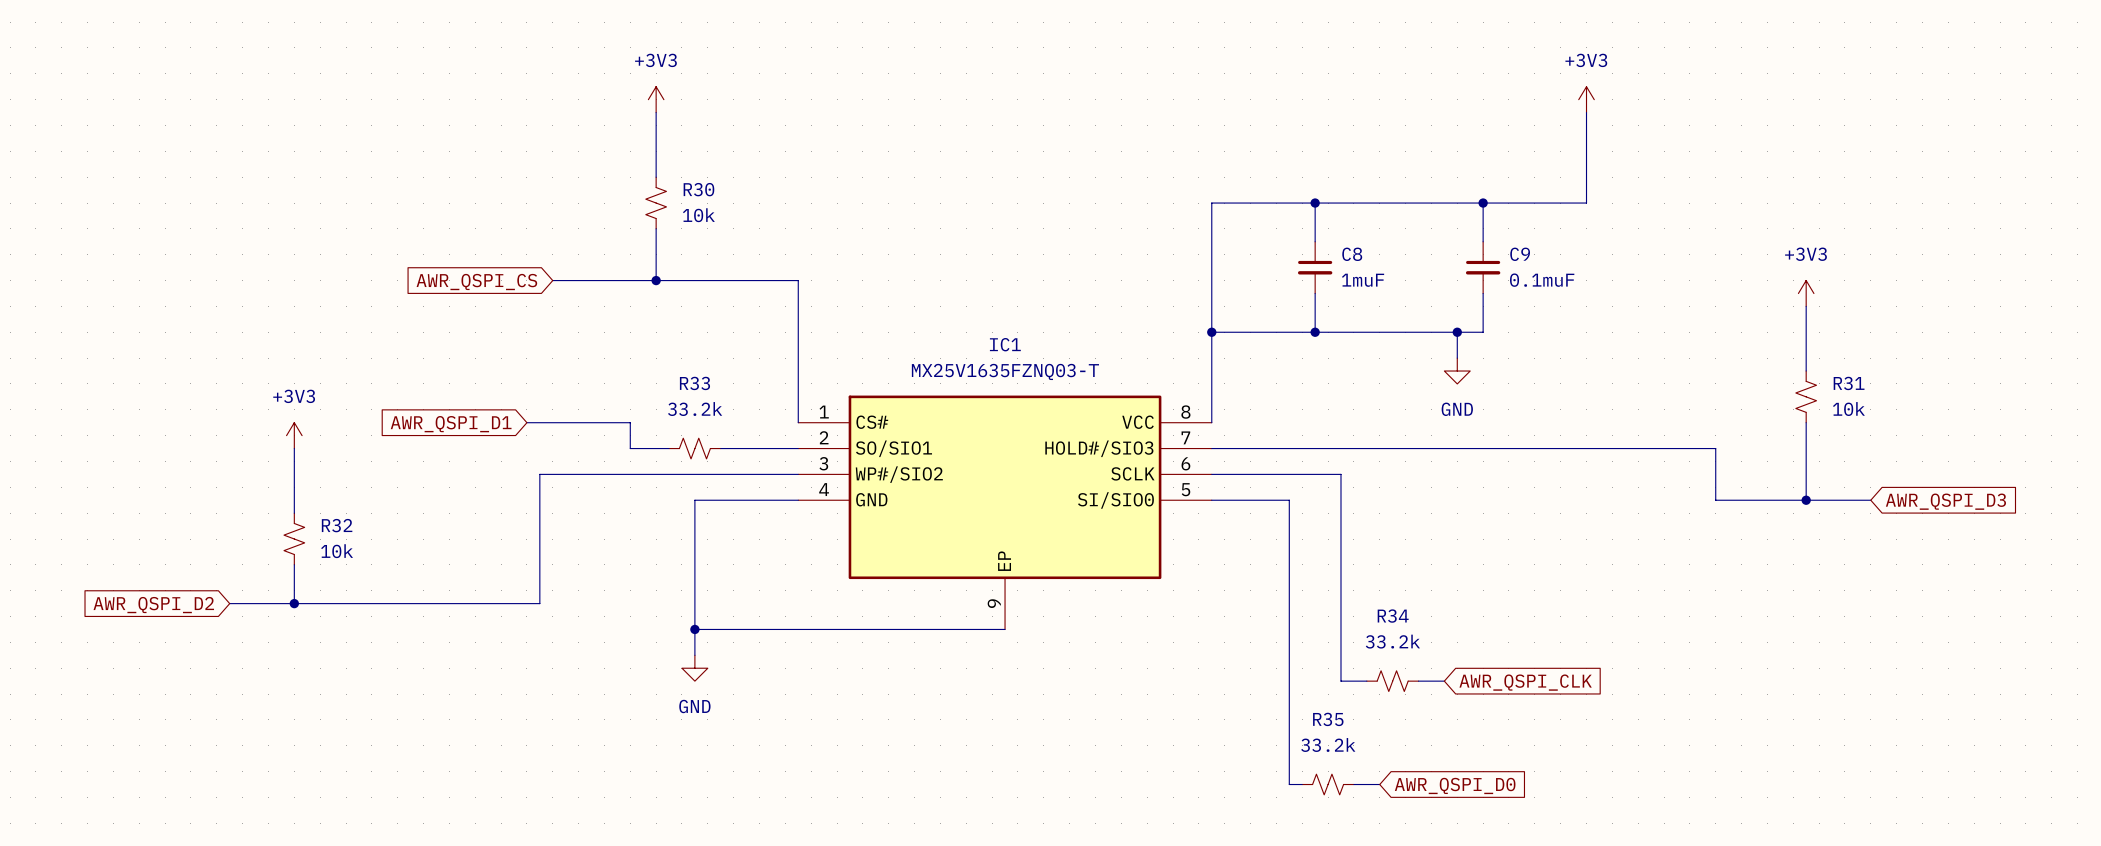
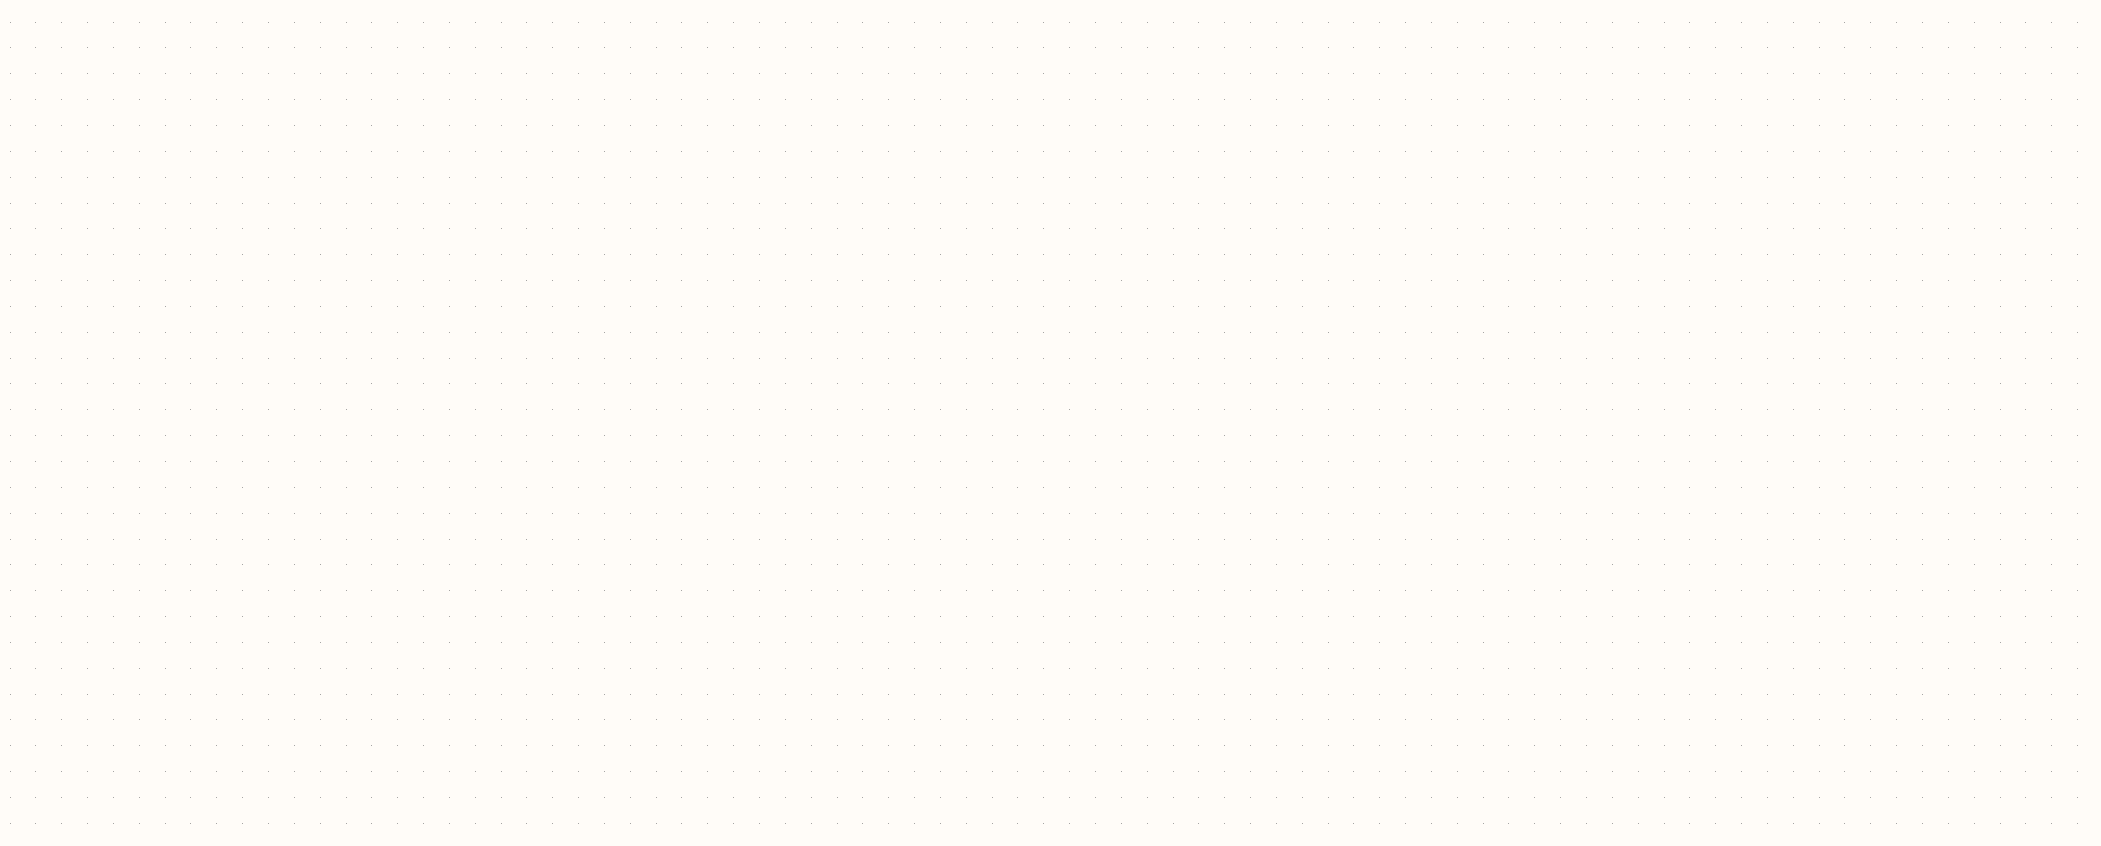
power symbol: +3V3 (656, 99) -> none
power symbol: +3V3 (1586, 99) -> none
wire: (656, 112) (656, 177) -> none
wire: (1586, 112) (1586, 203) (1211, 203) (1211, 422) -> none
R30: 10k (656, 203) -> none
wire: (1315, 203) (1315, 241) -> none
junction: (1315, 203) -> none
wire: (1483, 203) (1483, 241) -> none
junction: (1483, 203) -> none
wire: (656, 228) (656, 280) -> none
C8: 1muF (1315, 267) -> none
C9: 0.1muF (1483, 267) -> none
wire: (552, 280) (798, 280) (798, 422) -> none
junction: (656, 280) -> none
global label: AWR_QSPI_CS (476, 282) -> none
wire: (1315, 293) (1315, 332) -> none
wire: (1483, 293) (1483, 332) (1211, 332) -> none
power symbol: +3V3 (1806, 293) -> none
wire: (1806, 306) (1806, 371) -> none
junction: (1211, 332) -> none
junction: (1315, 332) -> none
wire: (1457, 332) (1457, 358) -> none
junction: (1457, 332) -> none
power symbol: GND (1457, 371) -> none
R31: 10k (1806, 396) -> none
wire: (526, 422) (630, 422) (630, 448) (669, 448) -> none
wire: (1806, 422) (1806, 500) -> none
global label: AWR_QSPI_D1 (451, 424) -> none
power symbol: +3V3 (294, 435) -> none
wire: (294, 448) (294, 513) -> none
R33: 33.2k (694, 448) -> none
wire: (720, 448) (798, 448) -> none
wire: (1211, 448) (1715, 448) (1715, 500) (1870, 500) -> none
wire: (798, 474) (539, 474) (539, 603) (229, 603) -> none
wire: (1211, 474) (1340, 474) (1340, 681) (1366, 681) -> none
wire: (798, 500) (694, 500) (694, 655) -> none
wire: (1211, 500) (1289, 500) (1289, 784) (1302, 784) -> none
junction: (1806, 500) -> none
global label: AWR_QSPI_D3 (1945, 501) -> none
IC1: MX25V1635FZNQ03-T (1005, 512) -> none
R32: 10k (294, 539) -> none
wire: (294, 564) (294, 603) -> none
junction: (294, 603) -> none
global label: AWR_QSPI_D2 (153, 605) -> none
wire: (694, 629) (1005, 629) -> none
junction: (694, 629) -> none
power symbol: GND (694, 668) -> none
R34: 33.2k (1392, 681) -> none
wire: (1418, 681) (1444, 681) -> none
global label: AWR_QSPI_CLK (1525, 682) -> none
R35: 33.2k (1328, 784) -> none
wire: (1353, 784) (1379, 784) -> none
global label: AWR_QSPI_D0 (1455, 785) -> none

